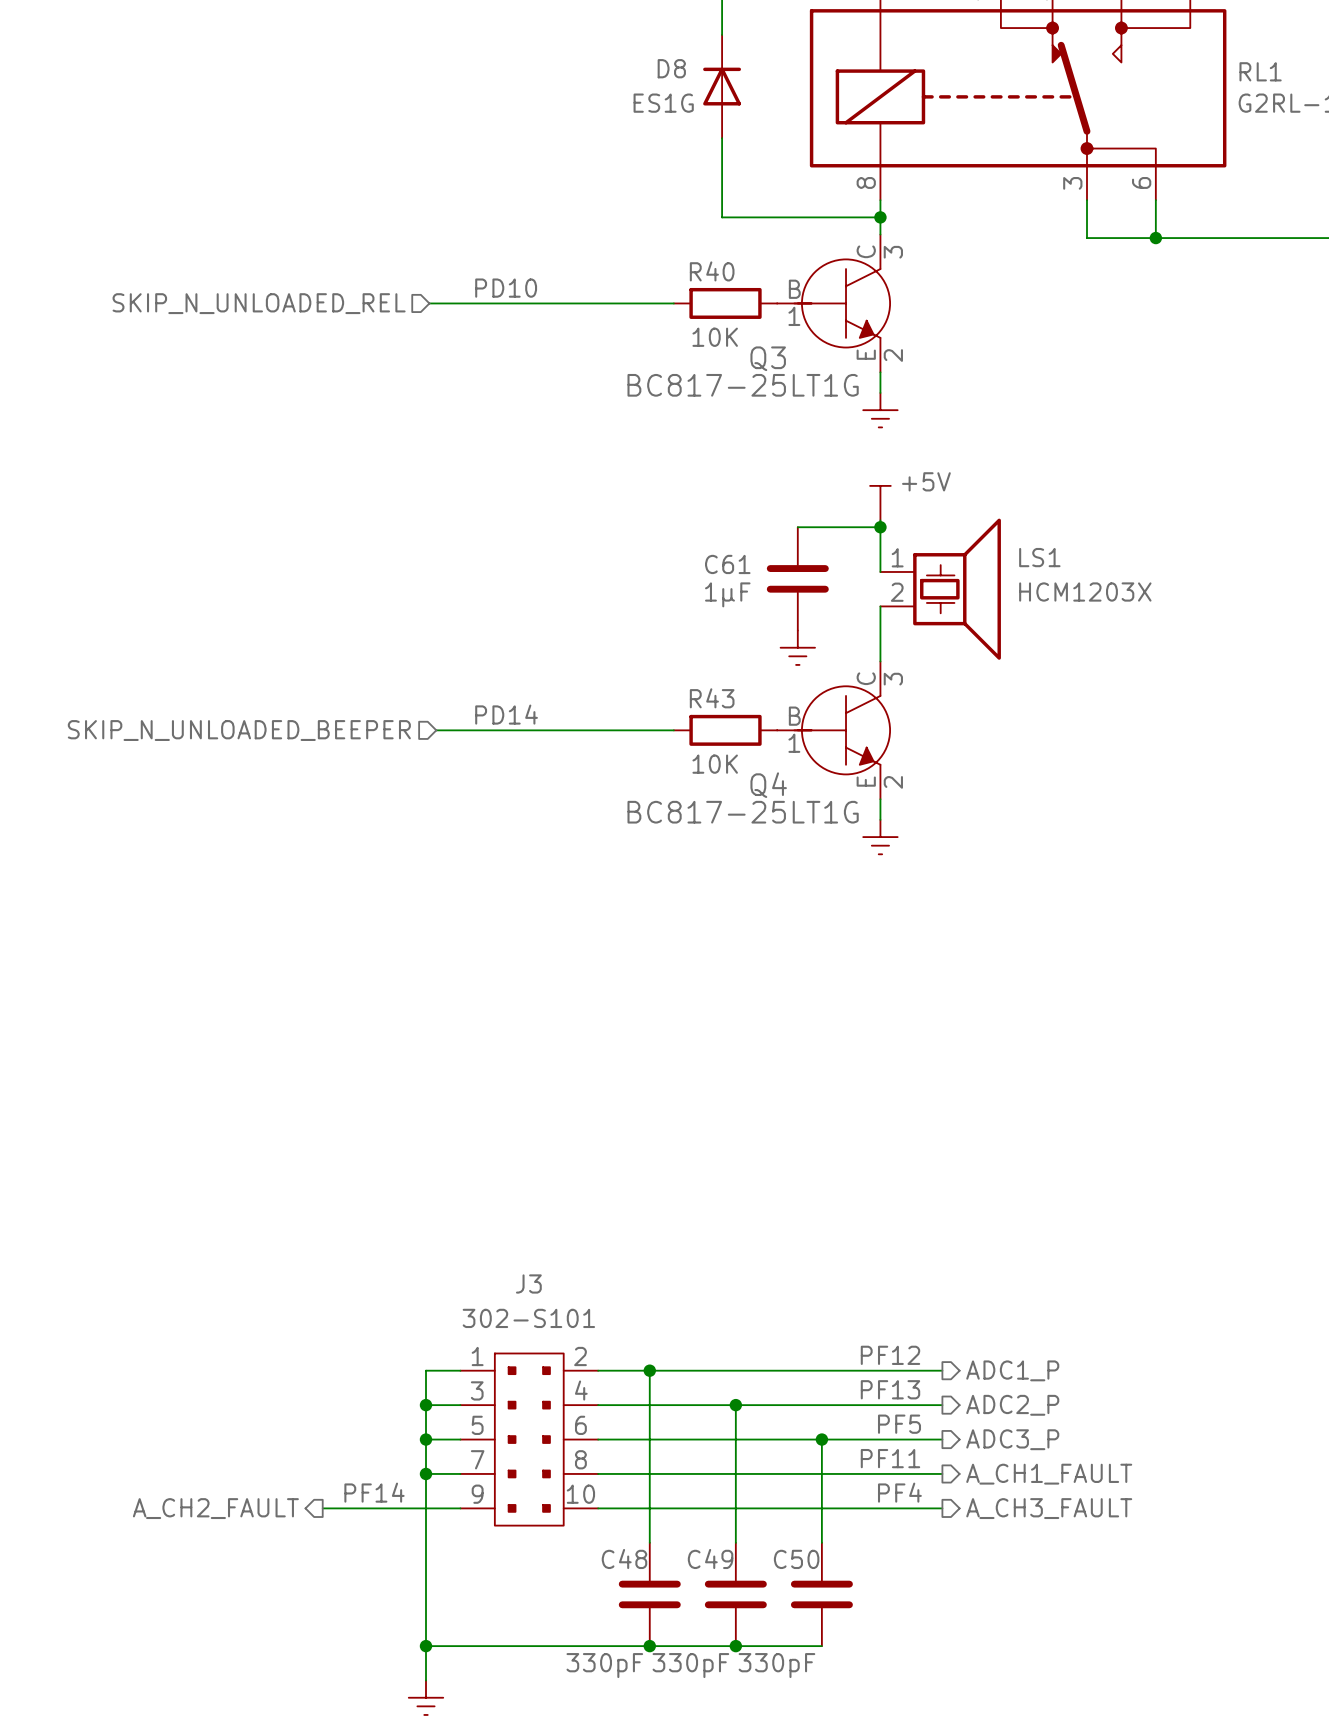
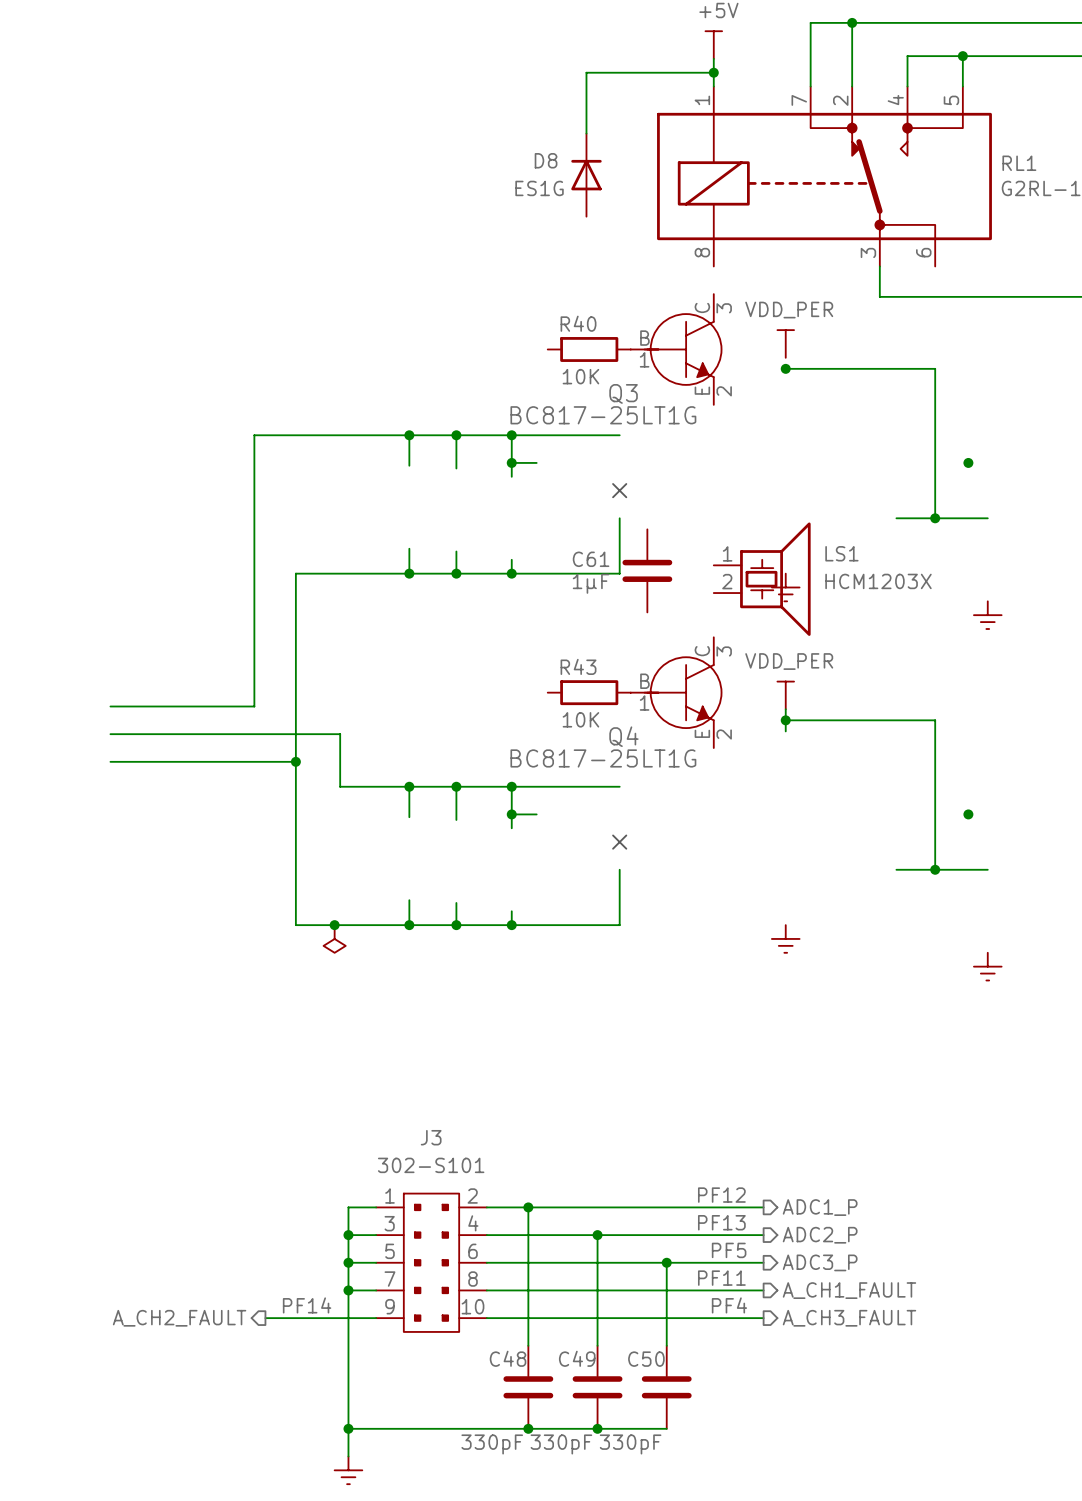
wire: (722, 138) (722, 217) (880, 217) -> none
wire: (880, 200) (880, 234) -> none
wire: (1155, 200) (1155, 238) -> none
junction: (880, 217) -> none
junction: (1155, 238) -> none
label: PD10 (506, 288) -> none
power symbol: none -> VDD_PER (785, 343)
hierarchical label: SKIP_N_UNLOADED_REL (259, 303) -> none
wire: (429, 303) (673, 303) -> none
wire: none -> (785, 368) (935, 368) (935, 518)
junction: none -> (785, 368)
wire: (880, 372) (880, 392) -> none
wire: none -> (409, 435) (409, 465)
junction: none -> (409, 435)
wire: none -> (456, 435) (456, 468)
junction: none -> (456, 435)
junction: none -> (511, 435)
wire: none -> (619, 435) (254, 435) (254, 706) (110, 706)
power symbol: (880, 410) -> none
wire: none -> (511, 462) (536, 462)
junction: none -> (511, 462)
junction: none -> (968, 462)
no-connect mark: none -> (619, 490)
power symbol: +5V (880, 503) -> none
wire: none -> (619, 518) (619, 573) (295, 573) (295, 925) (619, 925) (619, 869)
wire: none -> (896, 518) (987, 518)
junction: none -> (935, 518)
wire: (880, 520) (880, 571) -> (511, 435) (511, 476)
wire: (797, 527) (880, 527) -> none
junction: (880, 527) -> none
wire: none -> (409, 548) (409, 573)
wire: none -> (456, 551) (456, 573)
wire: none -> (511, 559) (511, 573)
junction: none -> (409, 573)
junction: none -> (456, 573)
junction: none -> (511, 573)
power symbol: none -> (785, 587)
wire: (880, 606) (880, 661) -> none
power symbol: none -> (987, 615)
power symbol: (797, 647) -> none
label: PD14 (506, 714) -> none
hierarchical label: SKIP_N_UNLOADED_BEEPER (239, 730) -> none
wire: (436, 730) (673, 730) -> none
power symbol: none -> VDD_PER (785, 695)
wire: none -> (785, 709) (785, 731)
wire: none -> (785, 720) (935, 720) (935, 869)
junction: none -> (785, 720)
wire: none -> (110, 734) (340, 734) (340, 786) (619, 786)
wire: (880, 799) (880, 819) -> none
wire: none -> (110, 761) (295, 761)
junction: none -> (295, 761)
power symbol: (880, 837) -> none
wire: none -> (409, 786) (409, 817)
junction: none -> (409, 786)
wire: none -> (456, 786) (456, 819)
junction: none -> (456, 786)
wire: none -> (511, 786) (511, 828)
junction: none -> (511, 786)
wire: none -> (511, 814) (536, 814)
junction: none -> (511, 814)
junction: none -> (968, 814)
no-connect mark: none -> (619, 842)
wire: none -> (896, 869) (987, 869)
junction: none -> (935, 869)
wire: none -> (409, 900) (409, 925)
wire: none -> (456, 902) (456, 925)
wire: none -> (511, 911) (511, 925)
junction: none -> (334, 925)
junction: none -> (409, 925)
junction: none -> (456, 925)
junction: none -> (511, 925)
power symbol: none -> (334, 938)
power symbol: none -> (785, 938)
power symbol: none -> (987, 966)

